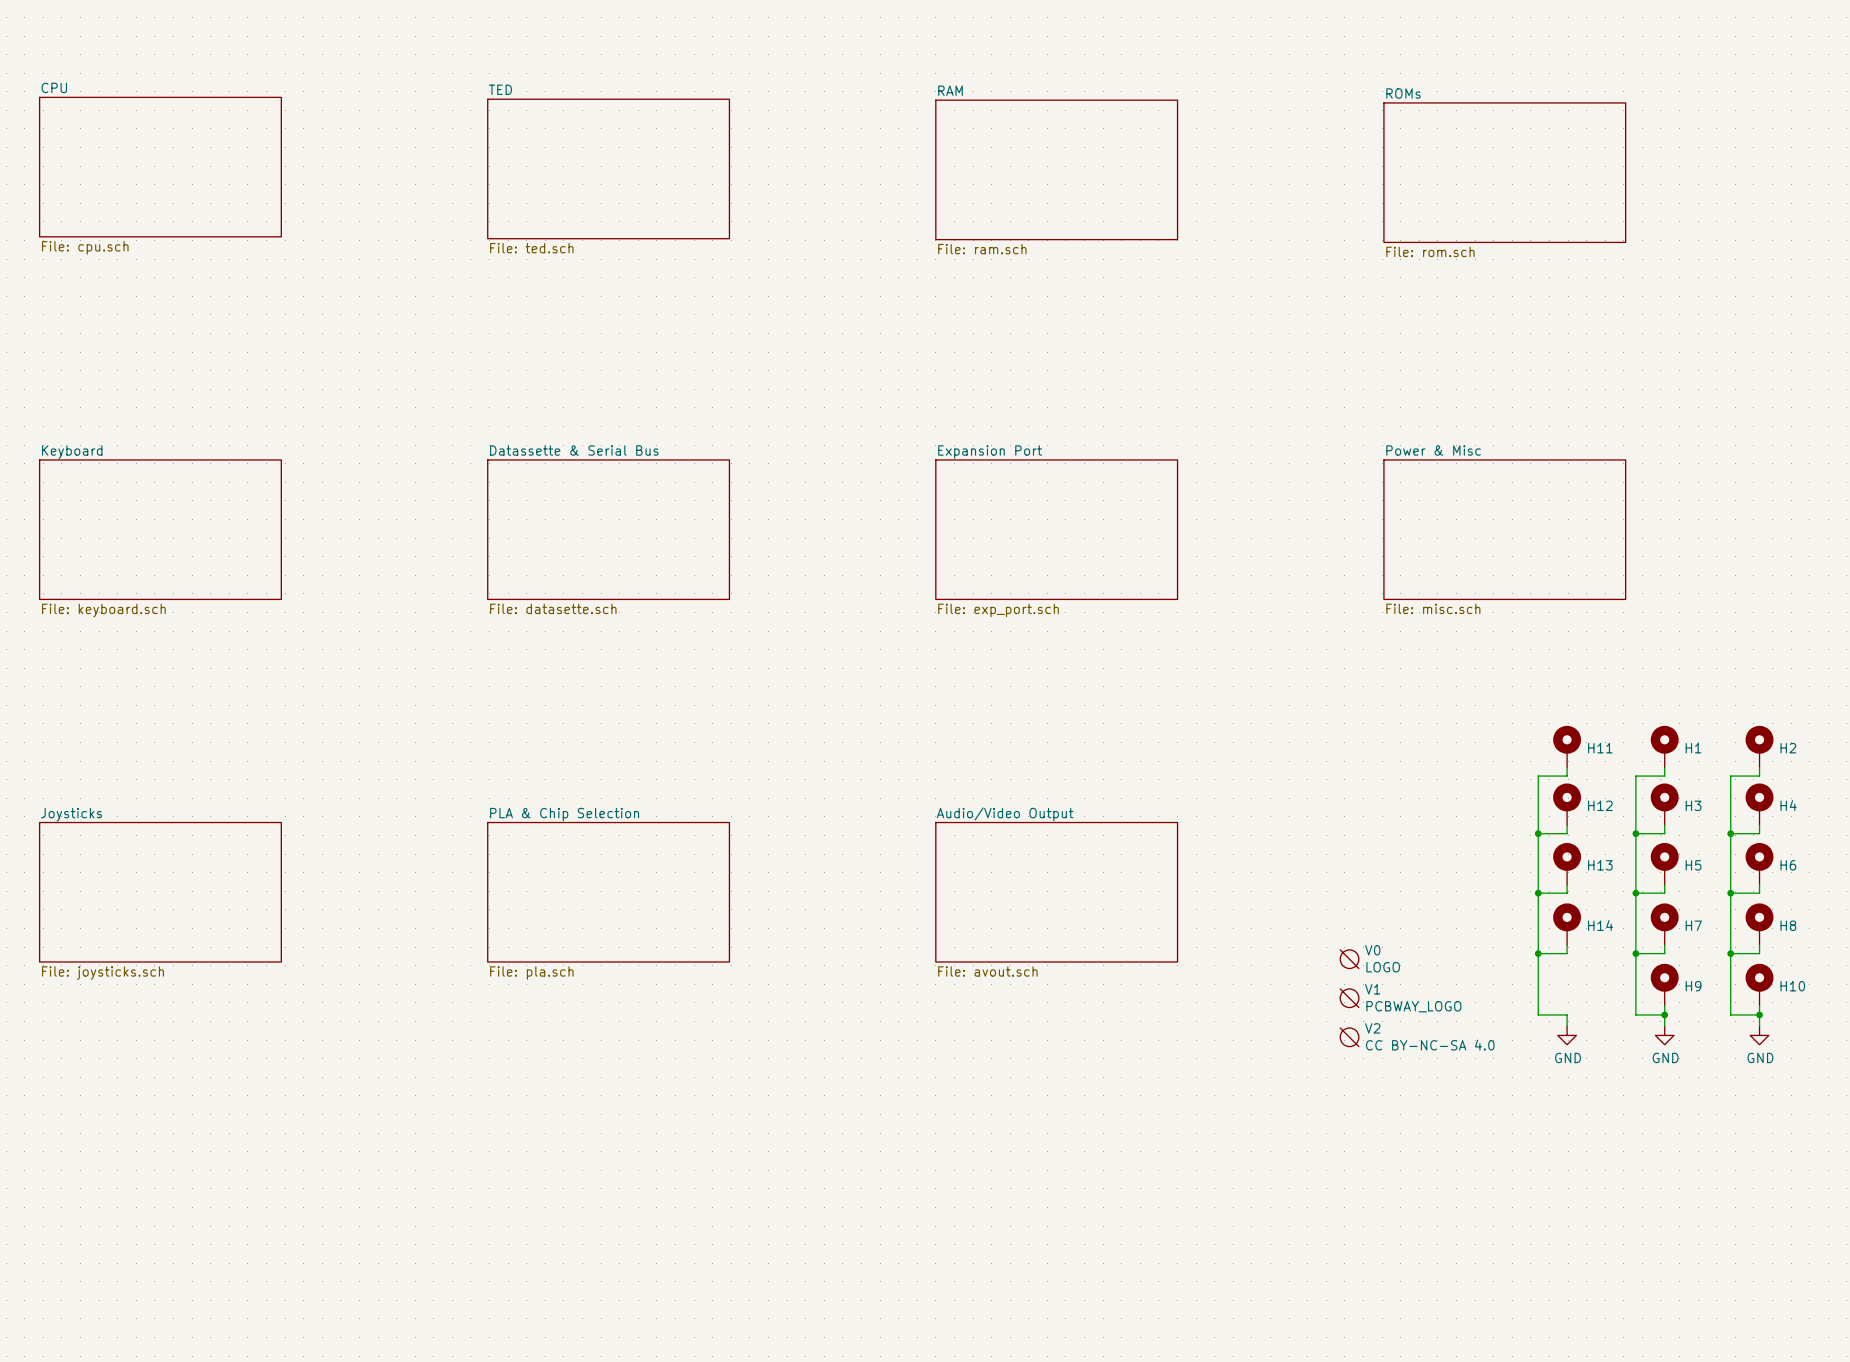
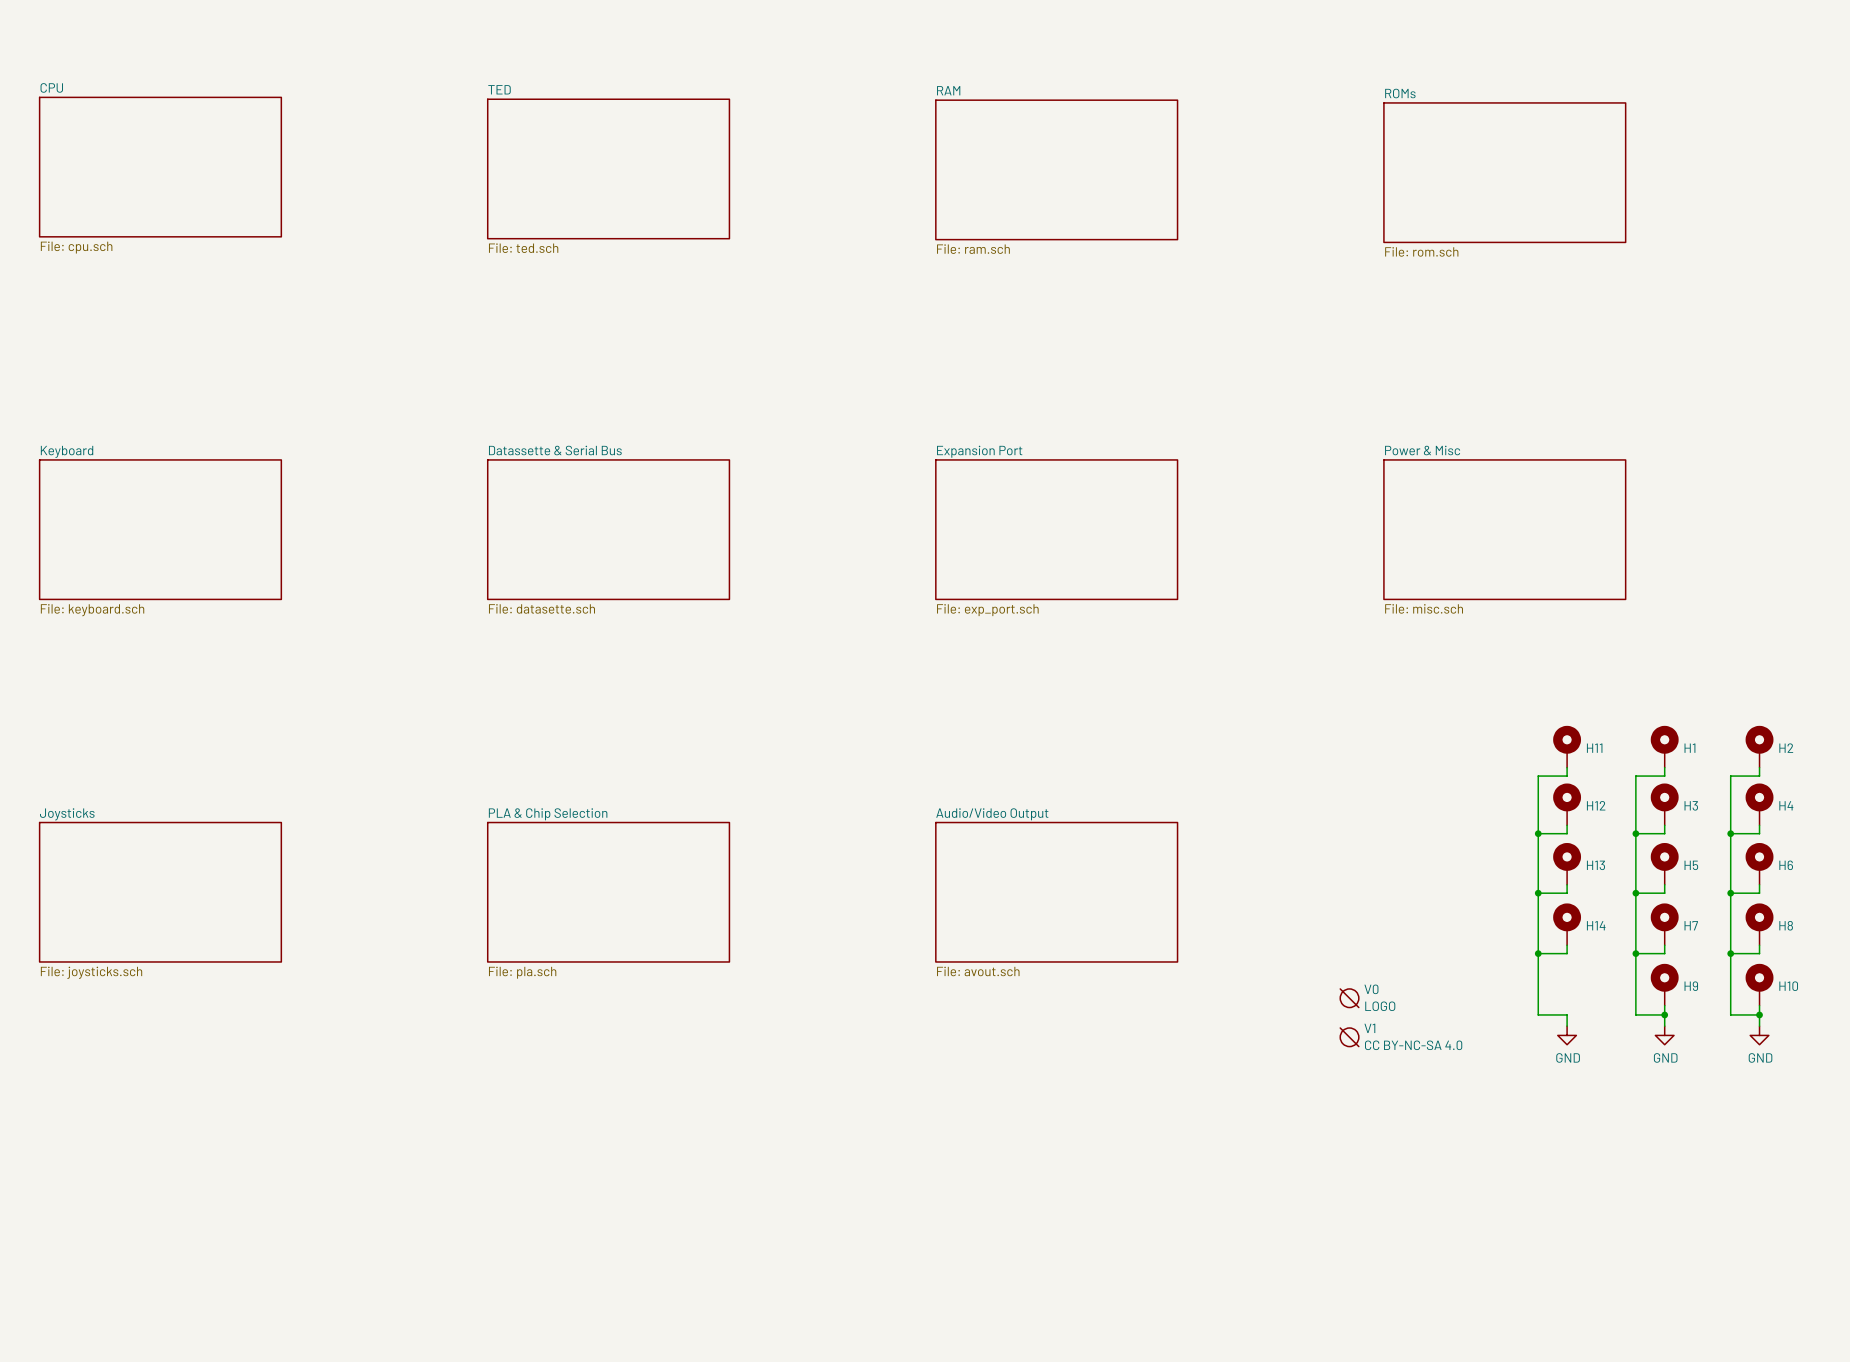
V0: LOGO (1349, 959) -> none
V1 name: V1 (1372, 989) -> V0 (1371, 989)
V1 value: PCBWAY_LOGO (1413, 1006) -> LOGO (1380, 1006)
V2 name: V2 (1372, 1028) -> V1 (1369, 1028)

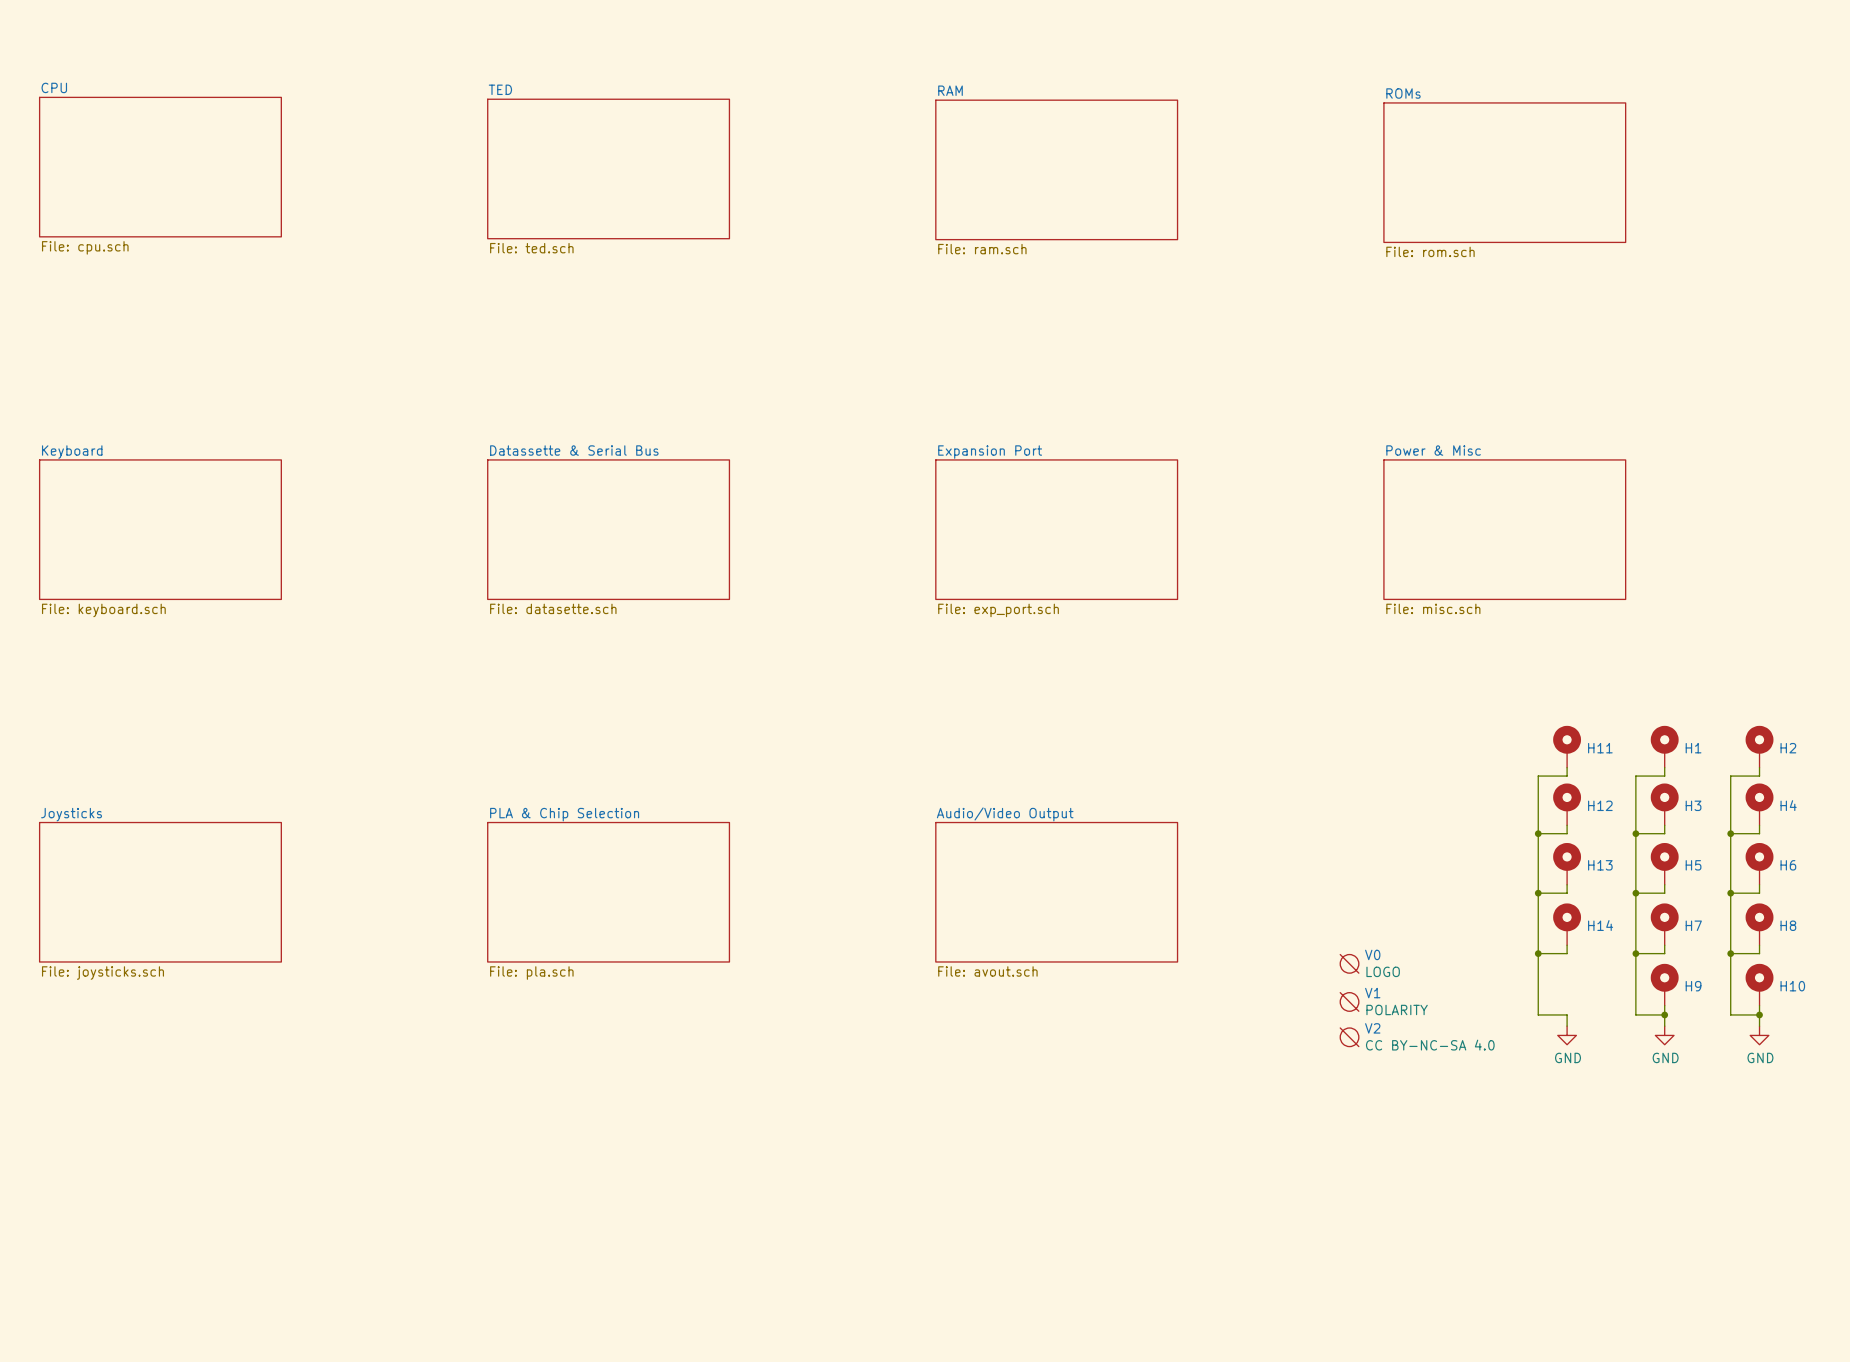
V0 position: (1349, 998) -> (1349, 963)
V1: none -> POLARITY (1349, 1001)
V1 name: V1 (1369, 1028) -> V2 (1372, 1028)

